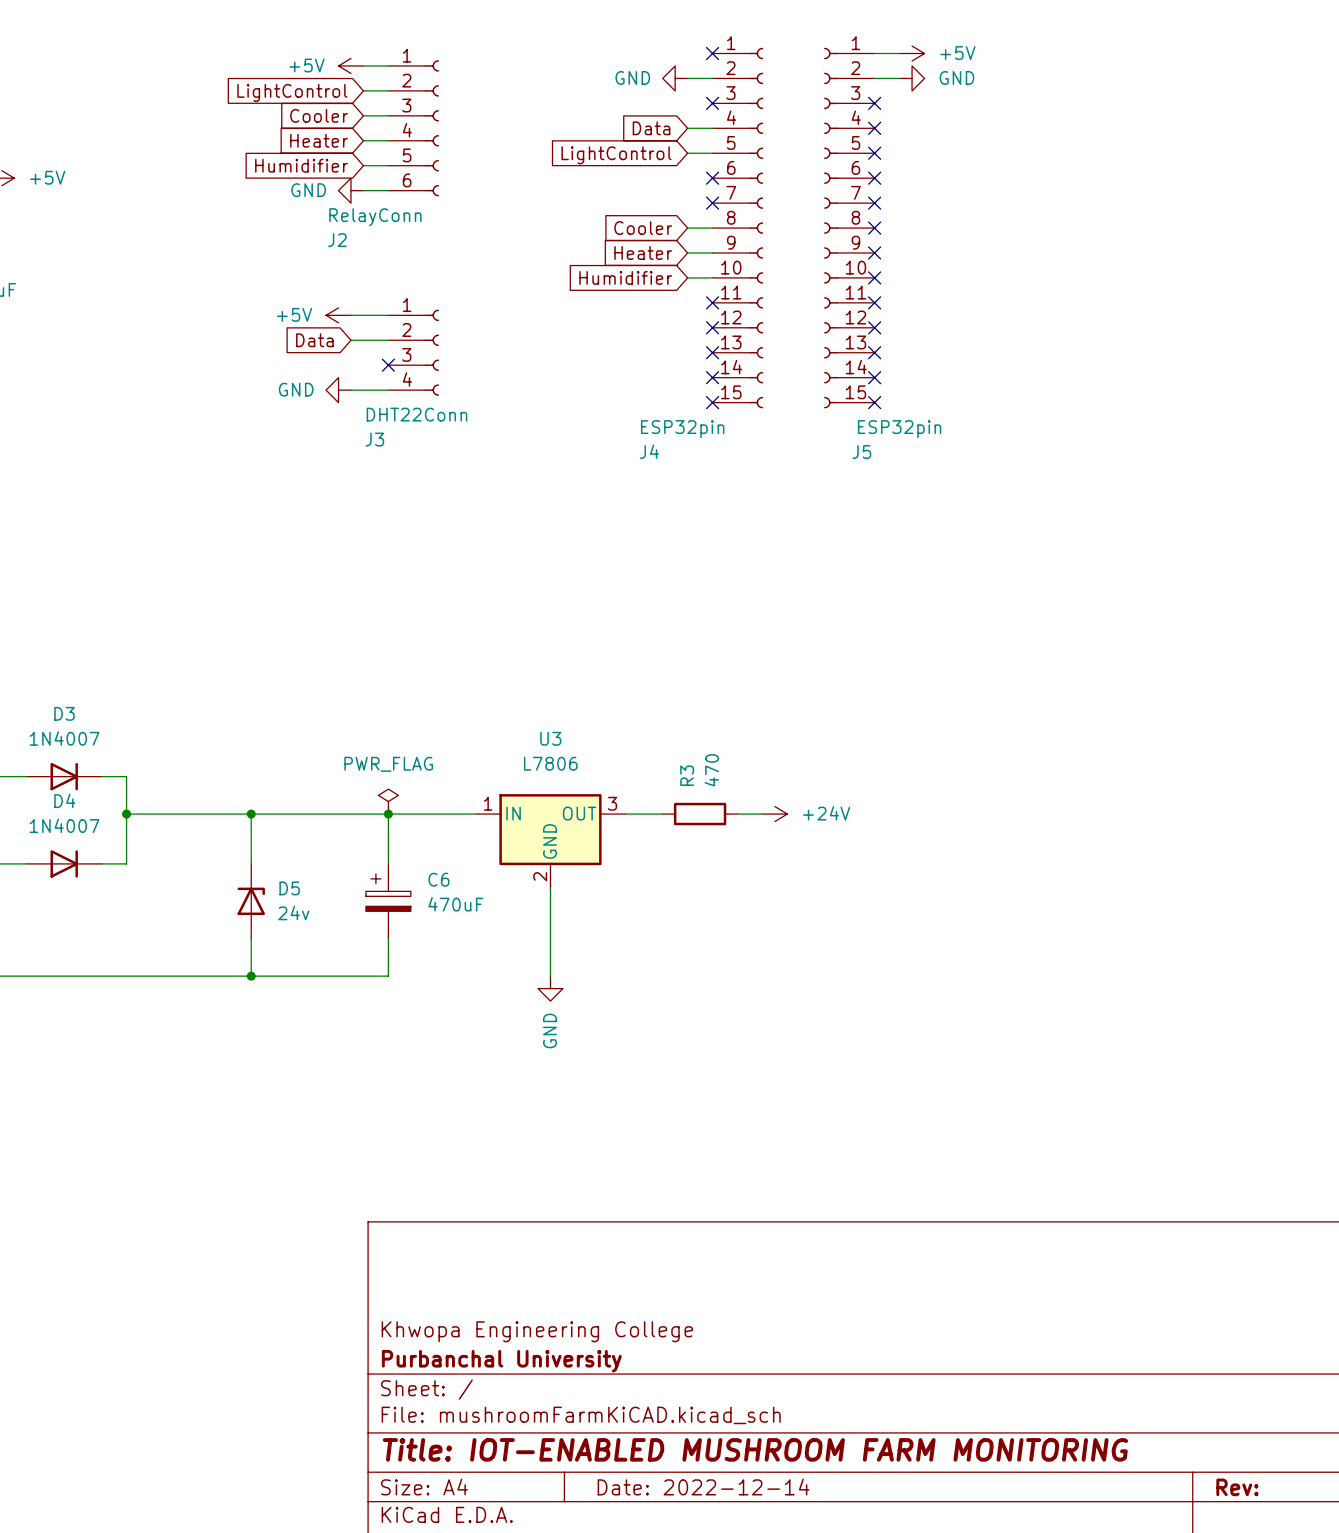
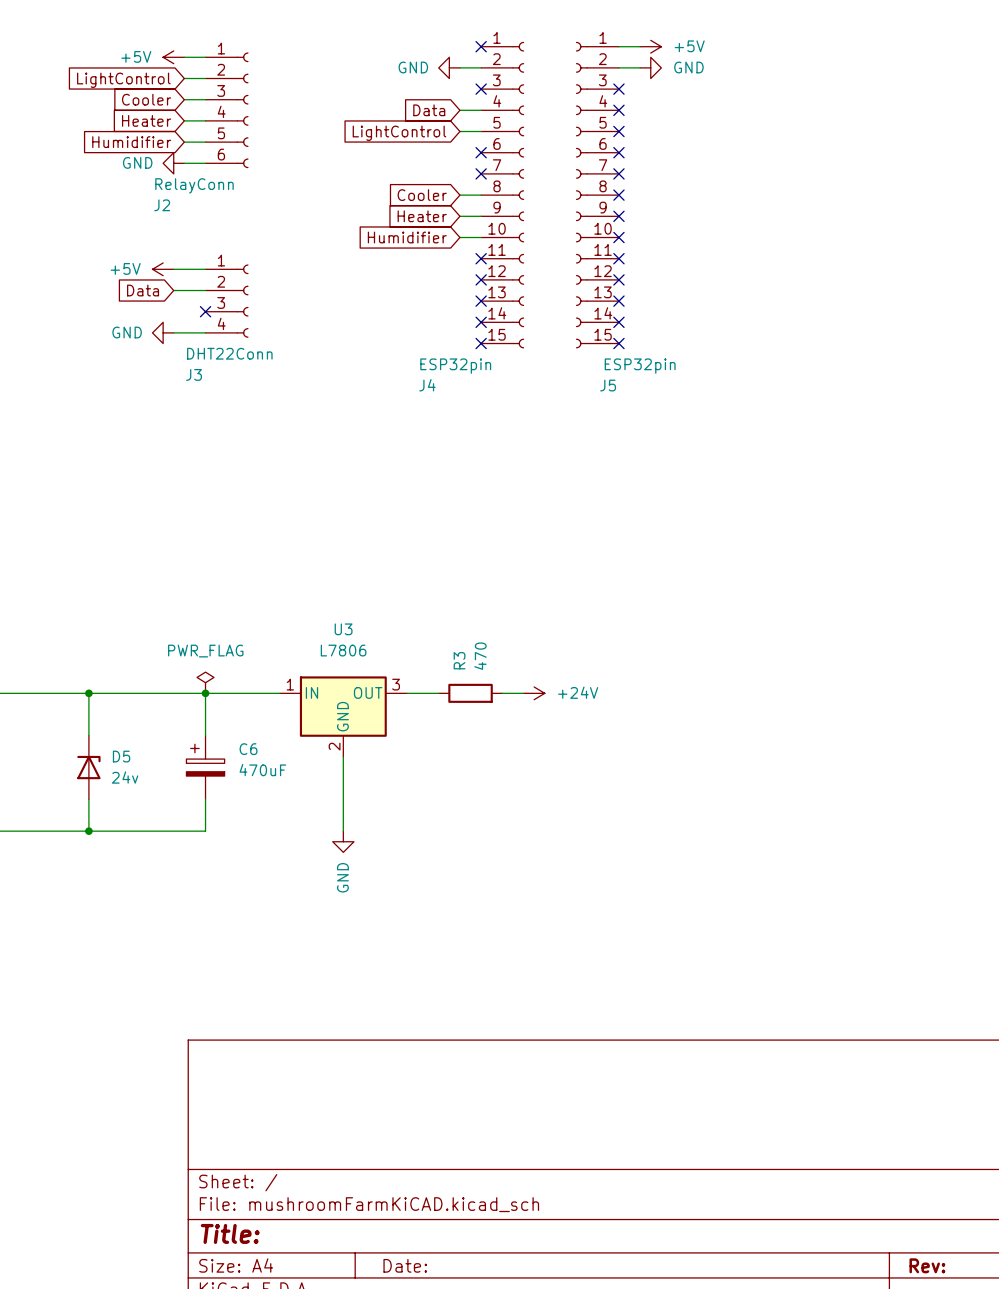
title block: Khwopa Engineering College (537, 1331) -> none
title block: Purbanchal University (501, 1361) -> none
title block: Title: IOT-ENABLED MUSHROOM FARM MONITORING (755, 1449) -> Title: (230, 1233)
title block: Date: 2022-12-14 (703, 1487) -> Date: (405, 1265)

